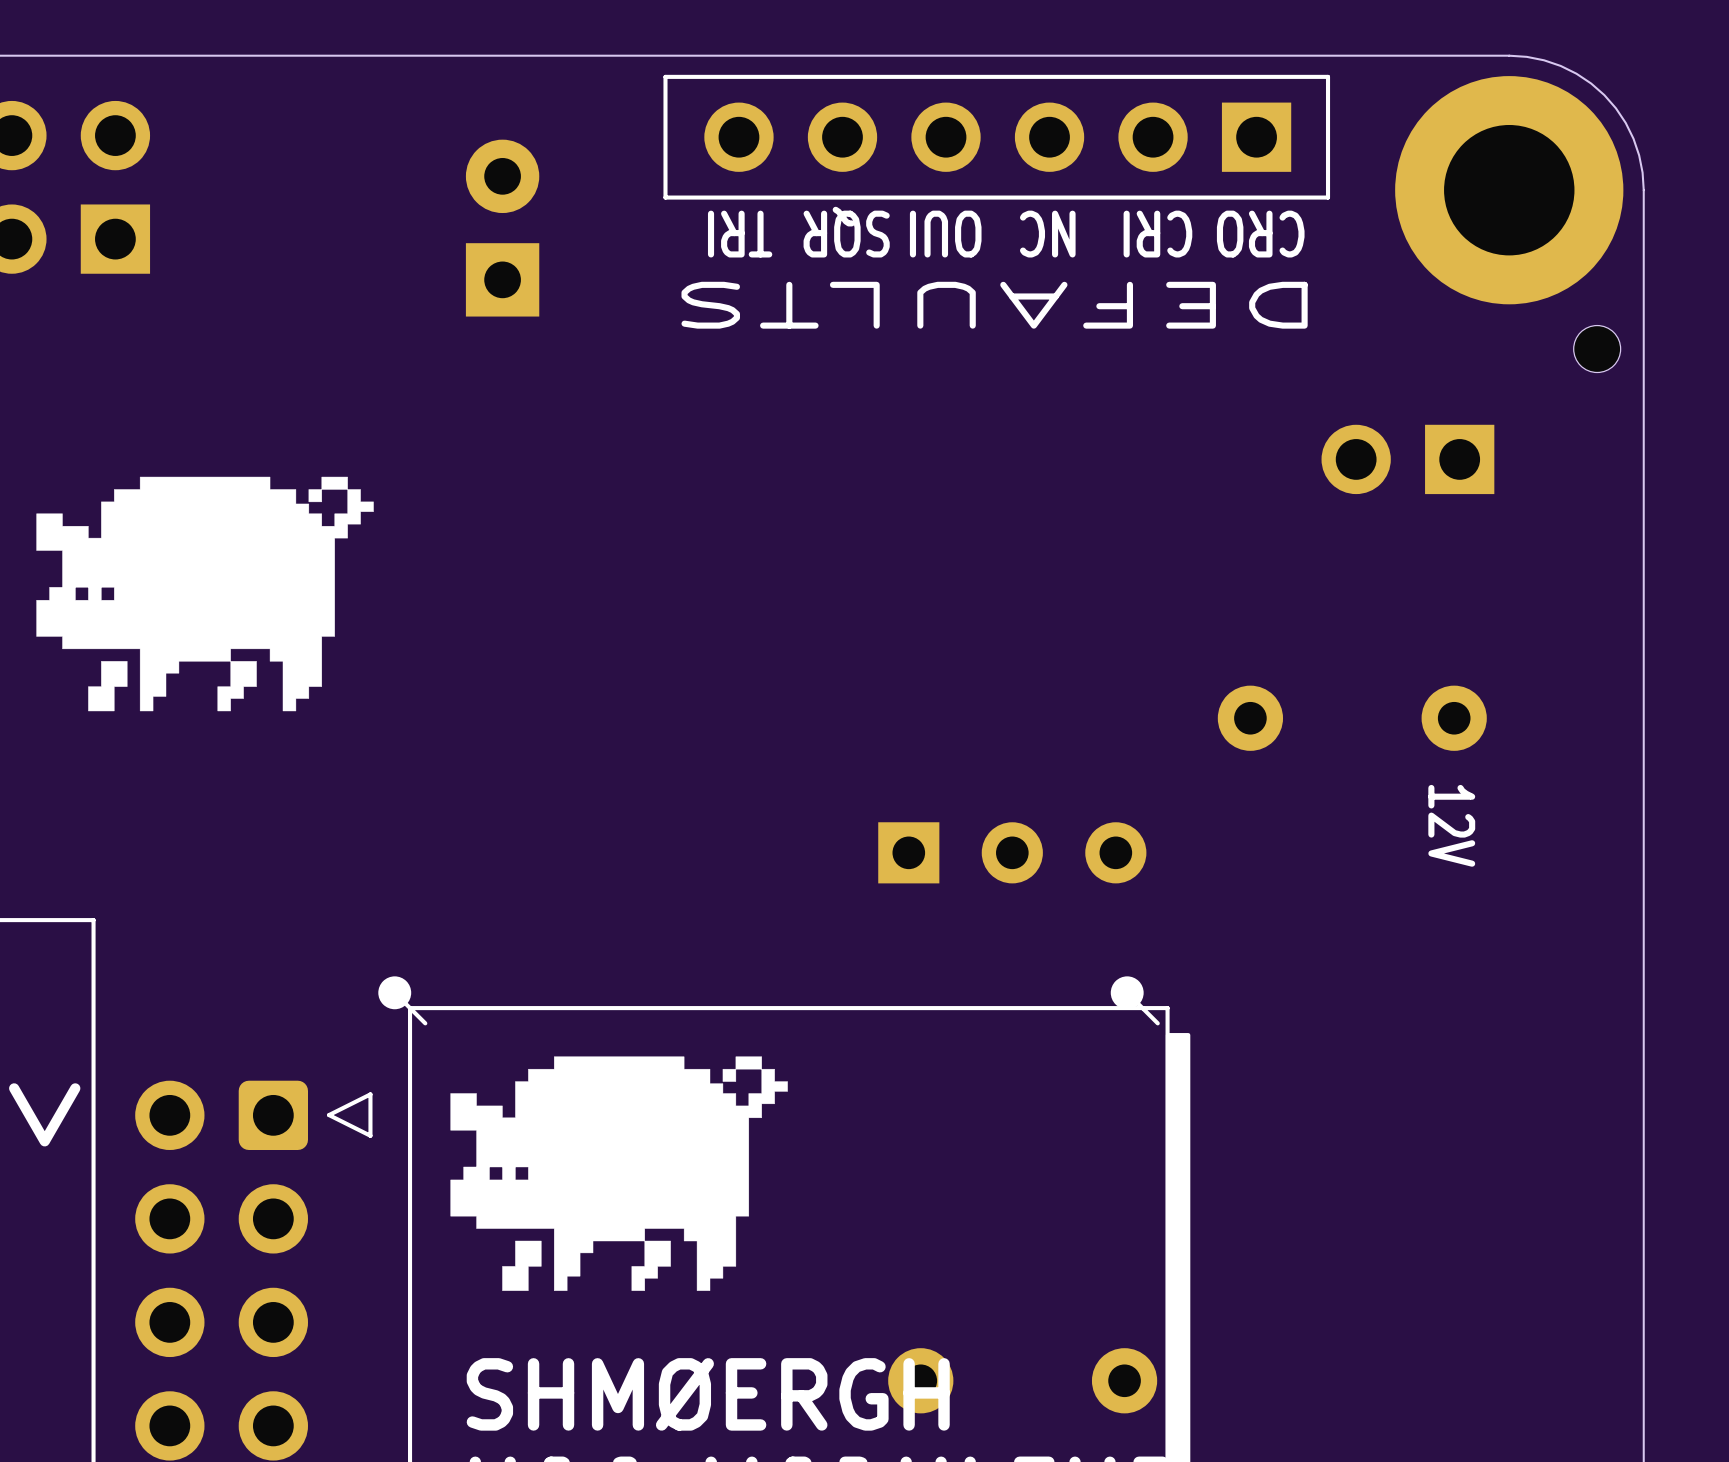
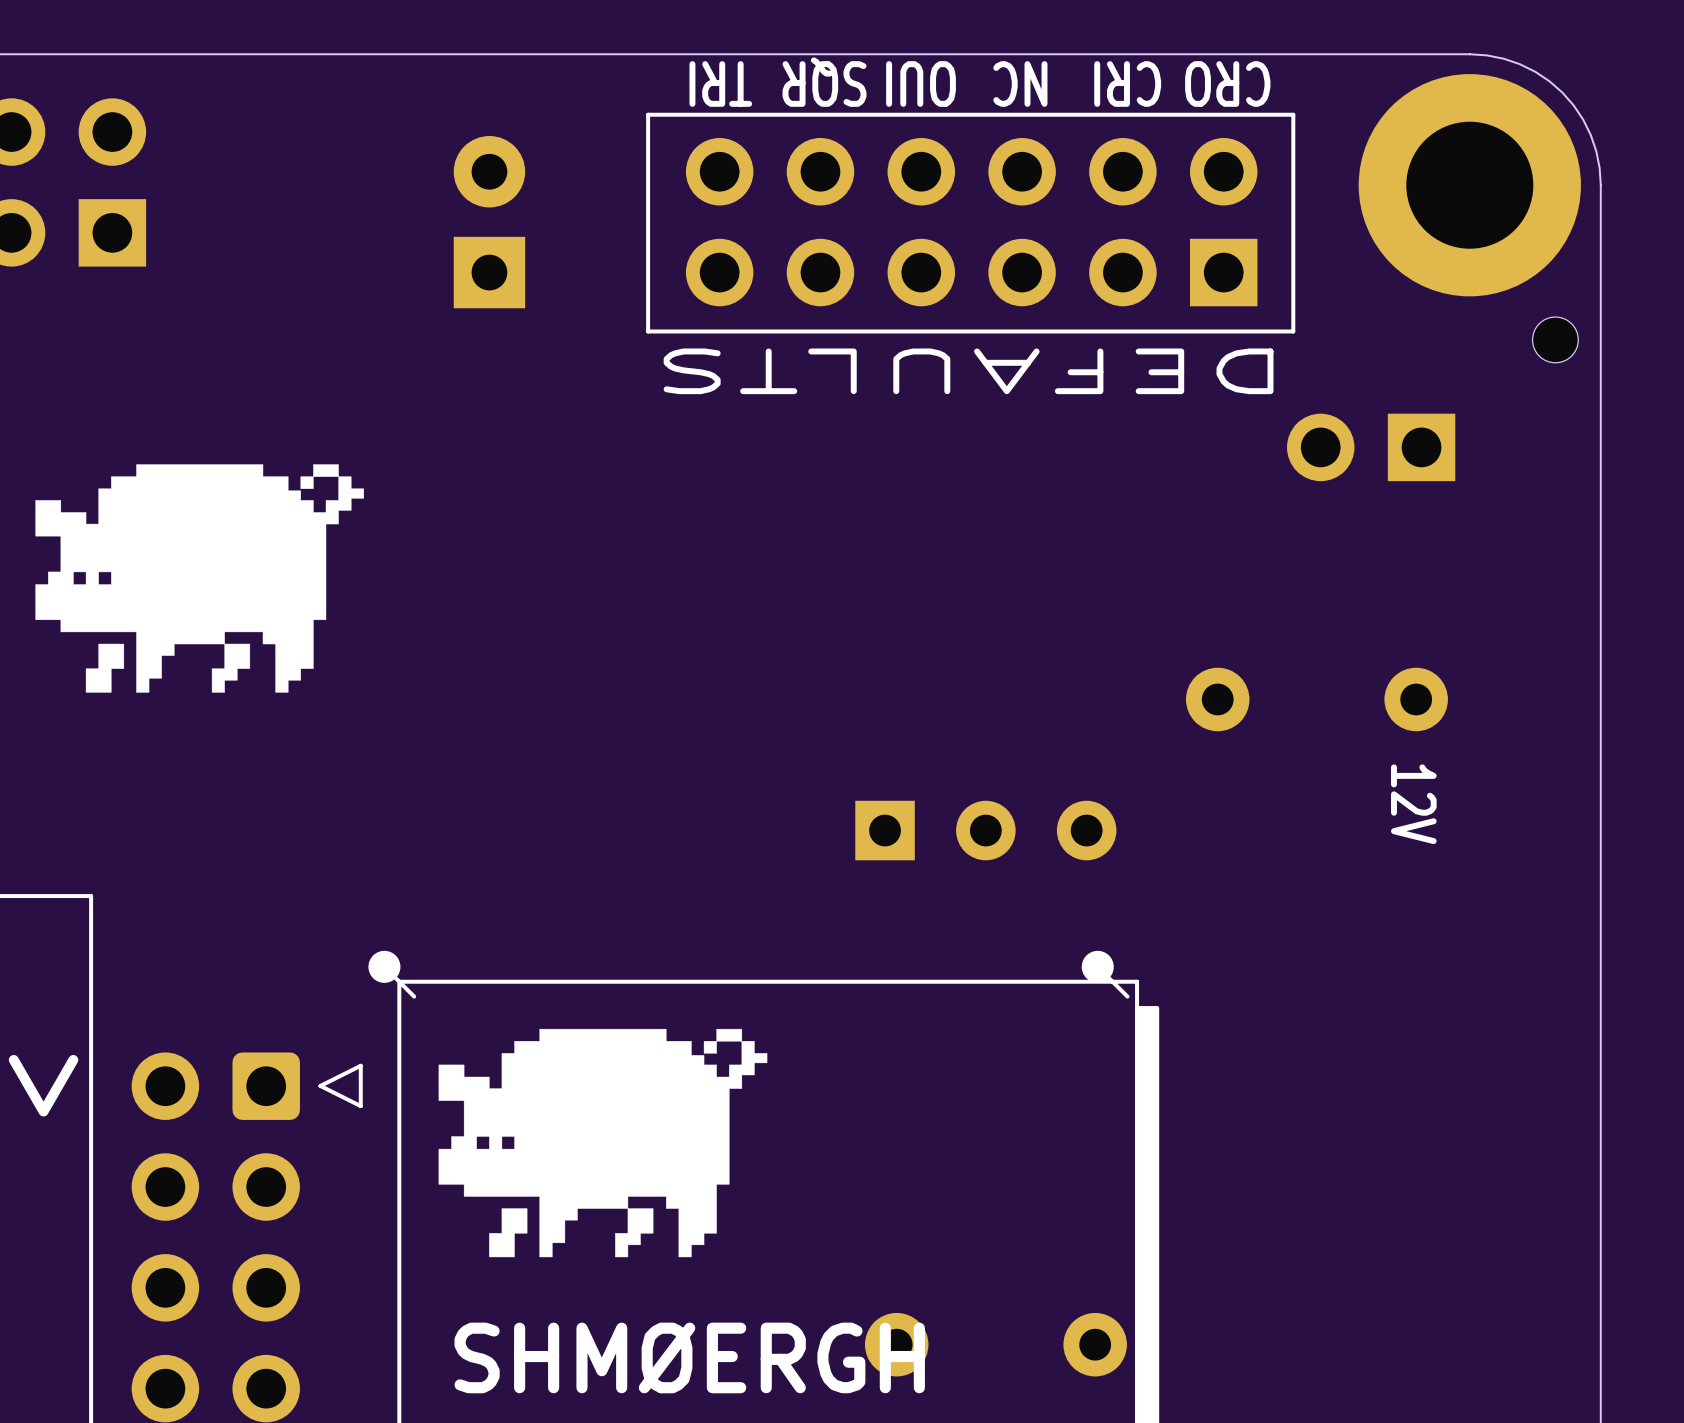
line: (1328, 117) (1328, 76) (665, 76) (665, 117) -> (1293, 114) (648, 114)
part: (997, 137) -> none
line: (1328, 197) (665, 197) -> (1293, 192) (1293, 331) (648, 331) (648, 192)
part: none -> (971, 222)
text position: SQR (846, 232) -> SQR (824, 82)
text position: TRI (740, 234) -> TRI (720, 83)
text position: OUI (945, 234) -> OUI (921, 83)
text position: NC (1047, 234) -> NC (1020, 83)
text position: CRI (1157, 234) -> CRI (1127, 83)
text position: CRO (1260, 234) -> CRO (1227, 83)
text position: DEFAULTS (994, 305) -> DEFAULTS (968, 371)

